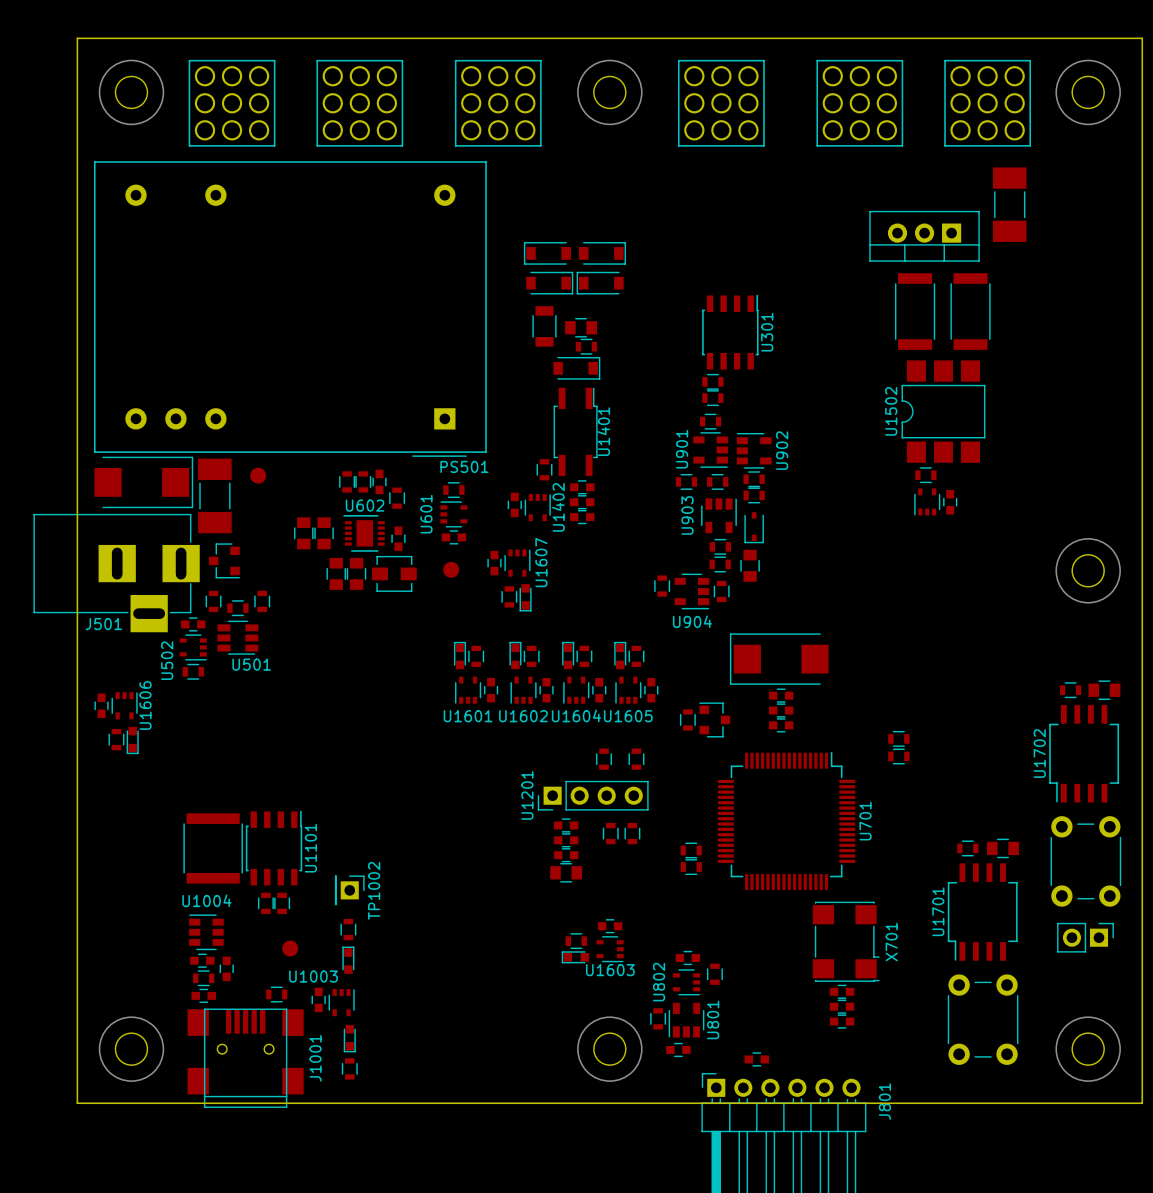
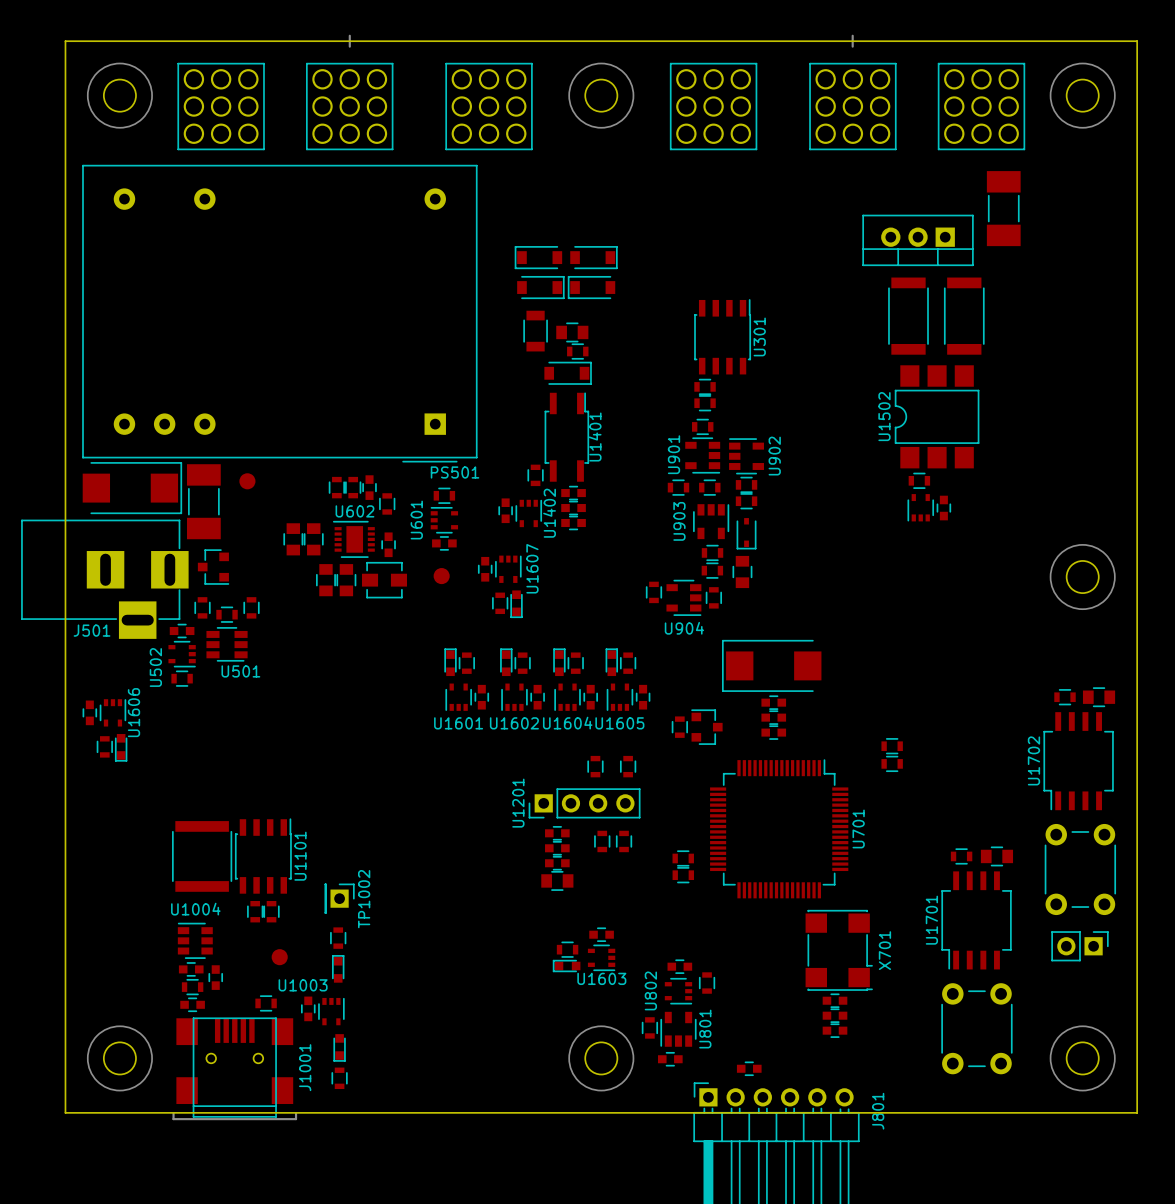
line: none -> (349, 35) (349, 46)
line: none -> (852, 35) (852, 46)
line: none -> (173, 1113) (173, 1119) (296, 1119) (296, 1113)

